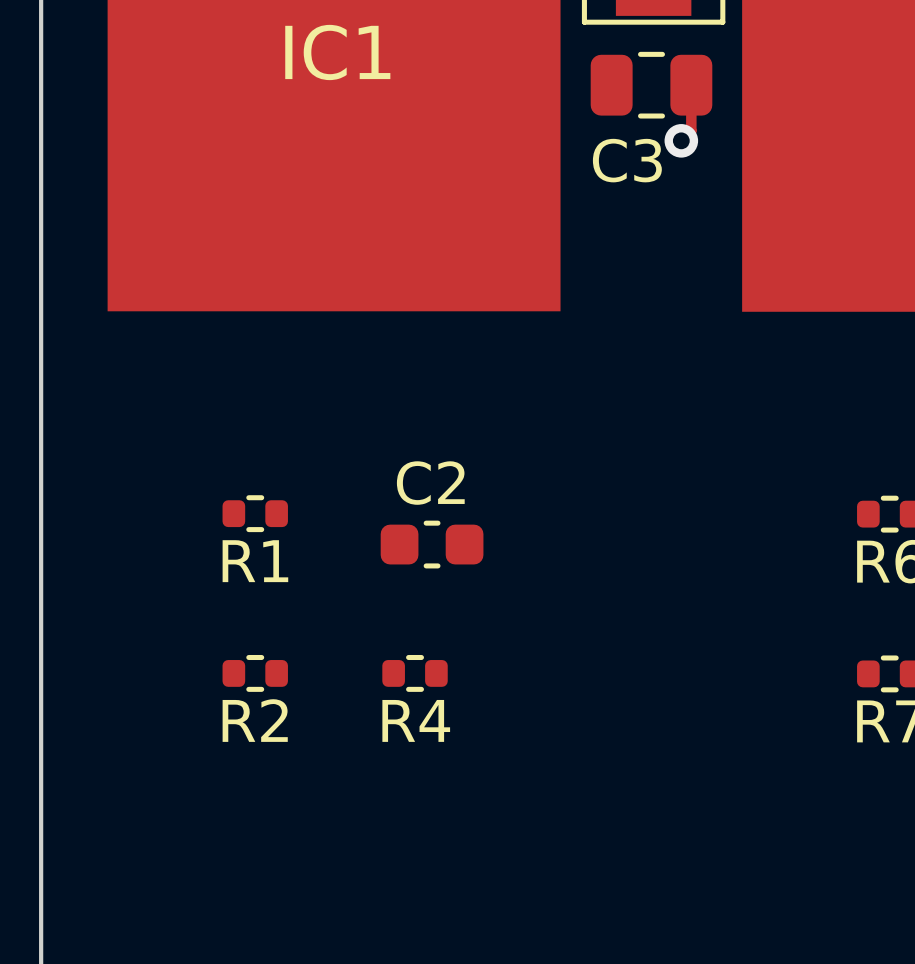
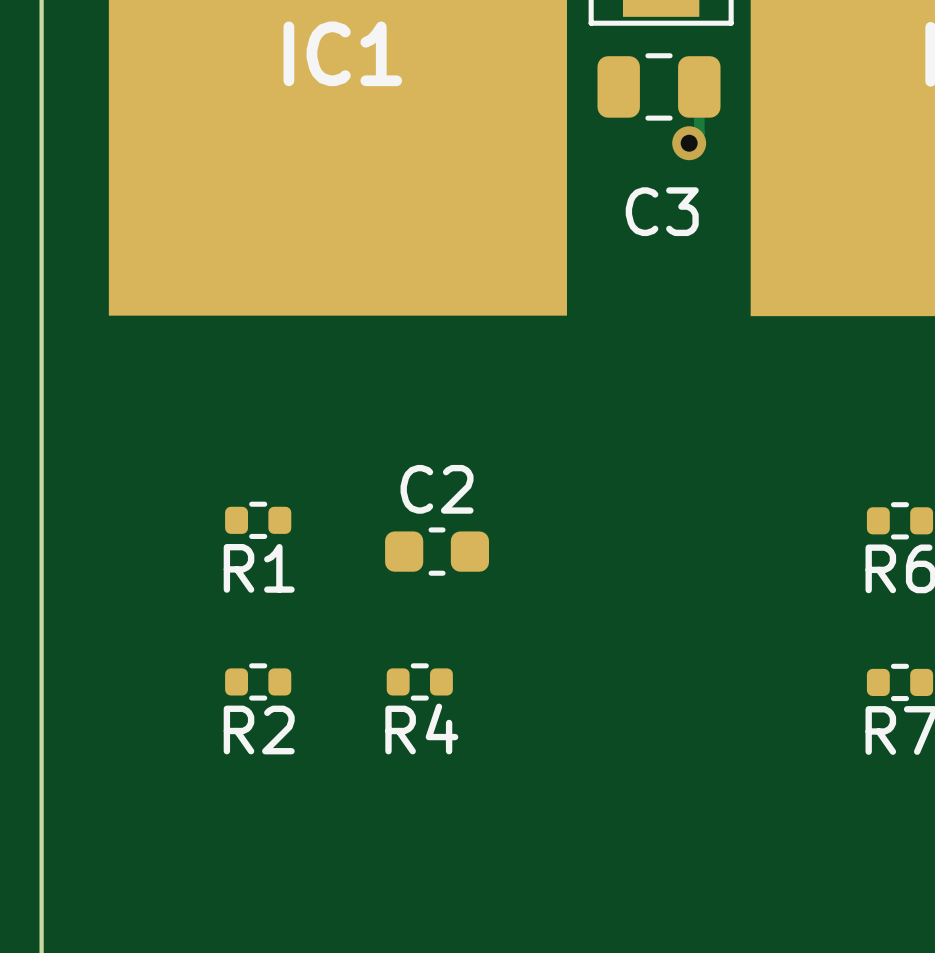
C3 name position: C3 (627, 160) -> C3 (662, 211)

